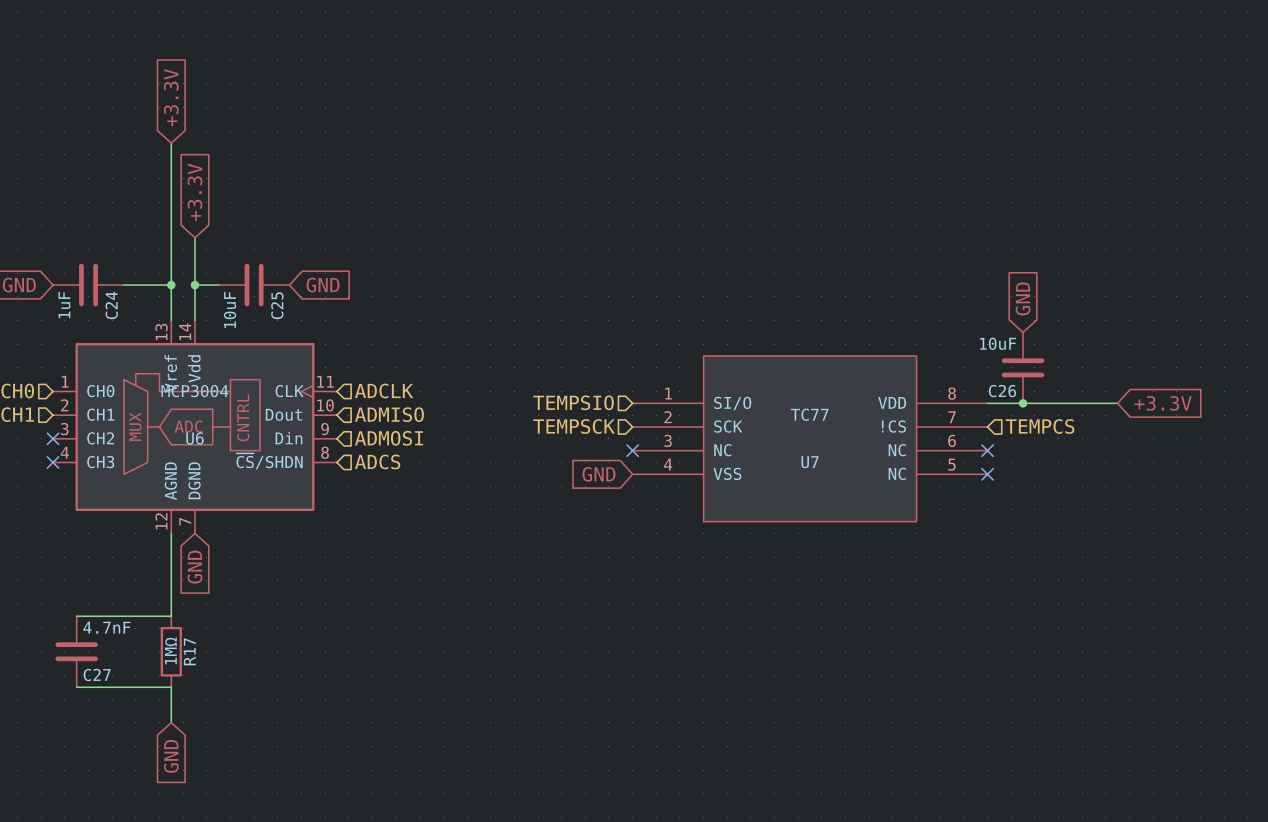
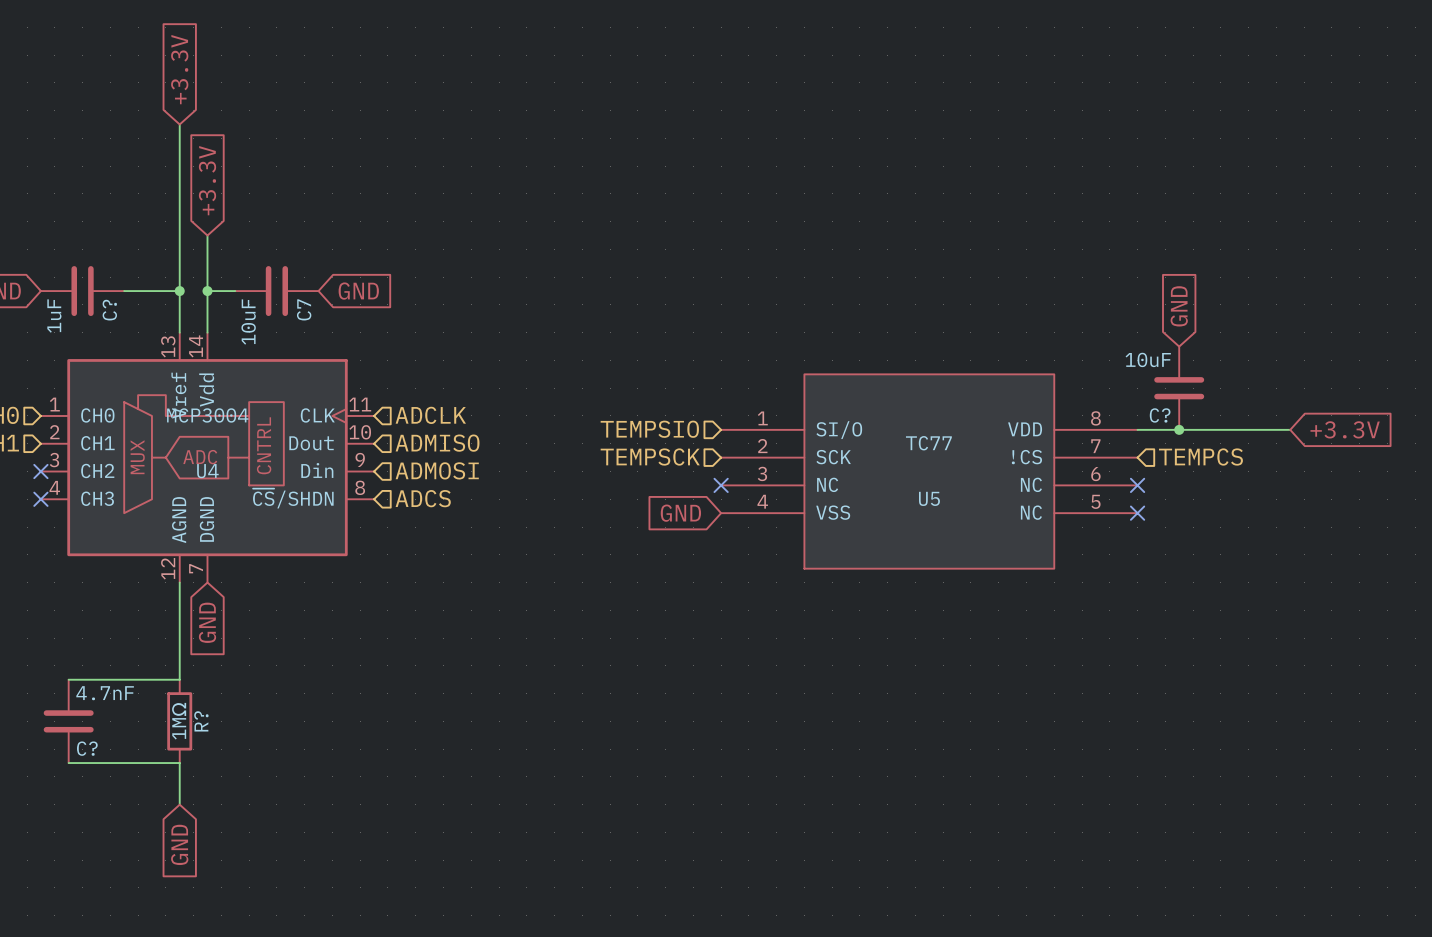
C24 name: C24 (111, 305) -> C? (109, 310)
C25 name: C25 (277, 305) -> C7 (304, 309)
C26 name: C26 (1002, 391) -> C? (1160, 415)
U6 name: U6 (195, 438) -> U4 (207, 471)
U7 name: U7 (810, 462) -> U5 (929, 498)
R17 name: R17 (189, 651) -> R? (201, 721)
C27 name: C27 (97, 674) -> C? (87, 748)

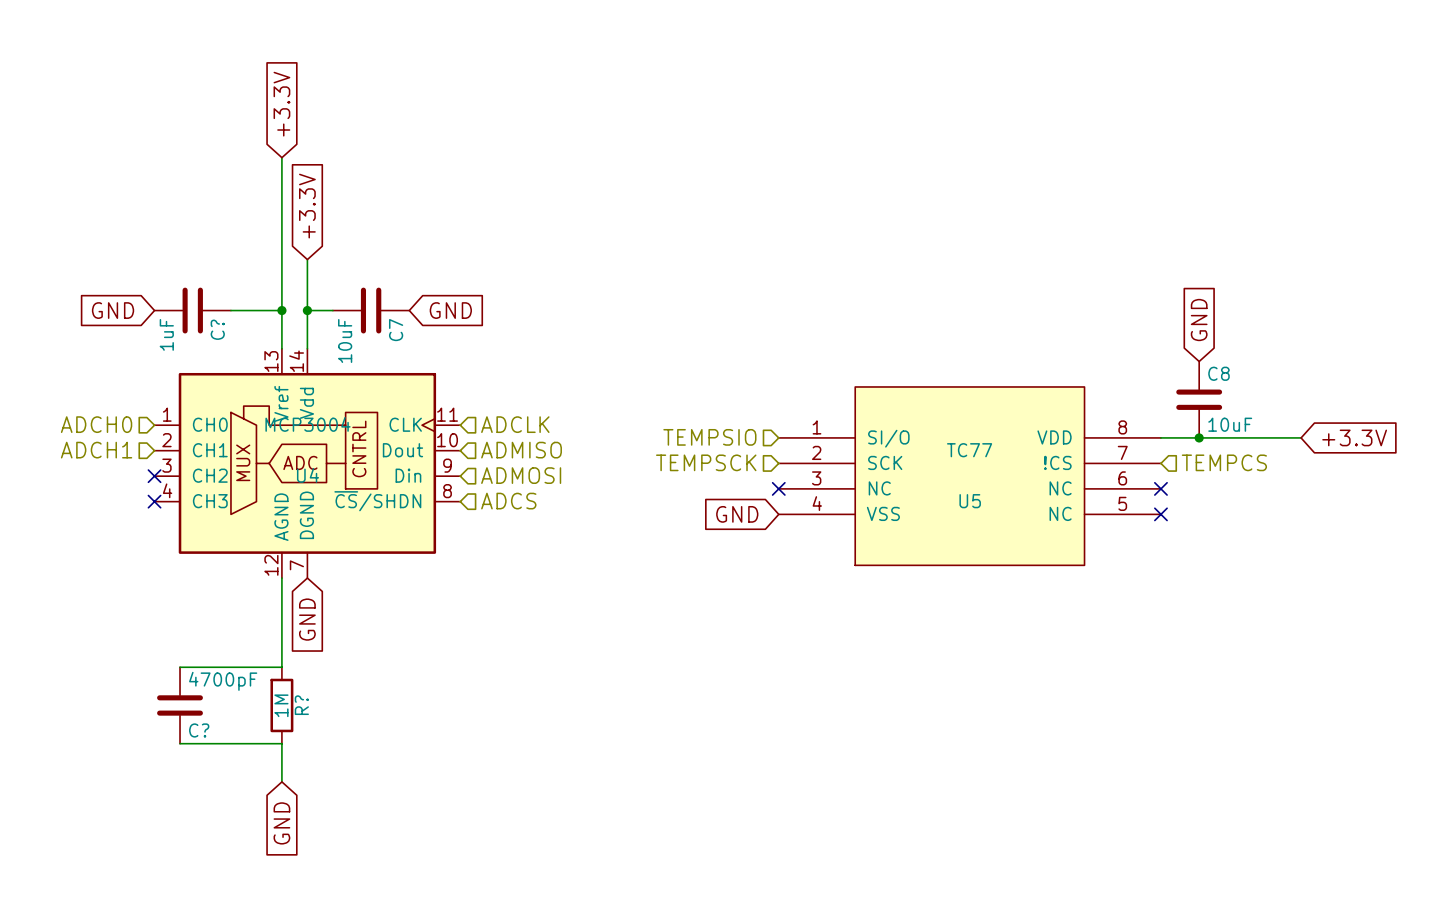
C? value position: 10uF (1148, 359) -> 10uF (1230, 424)
C? name: C? (1160, 415) -> C8 (1218, 373)
C? value: 4.7nF (105, 693) -> 4700pF (223, 681)
R? value: 1MΩ (179, 721) -> 1M (281, 705)

